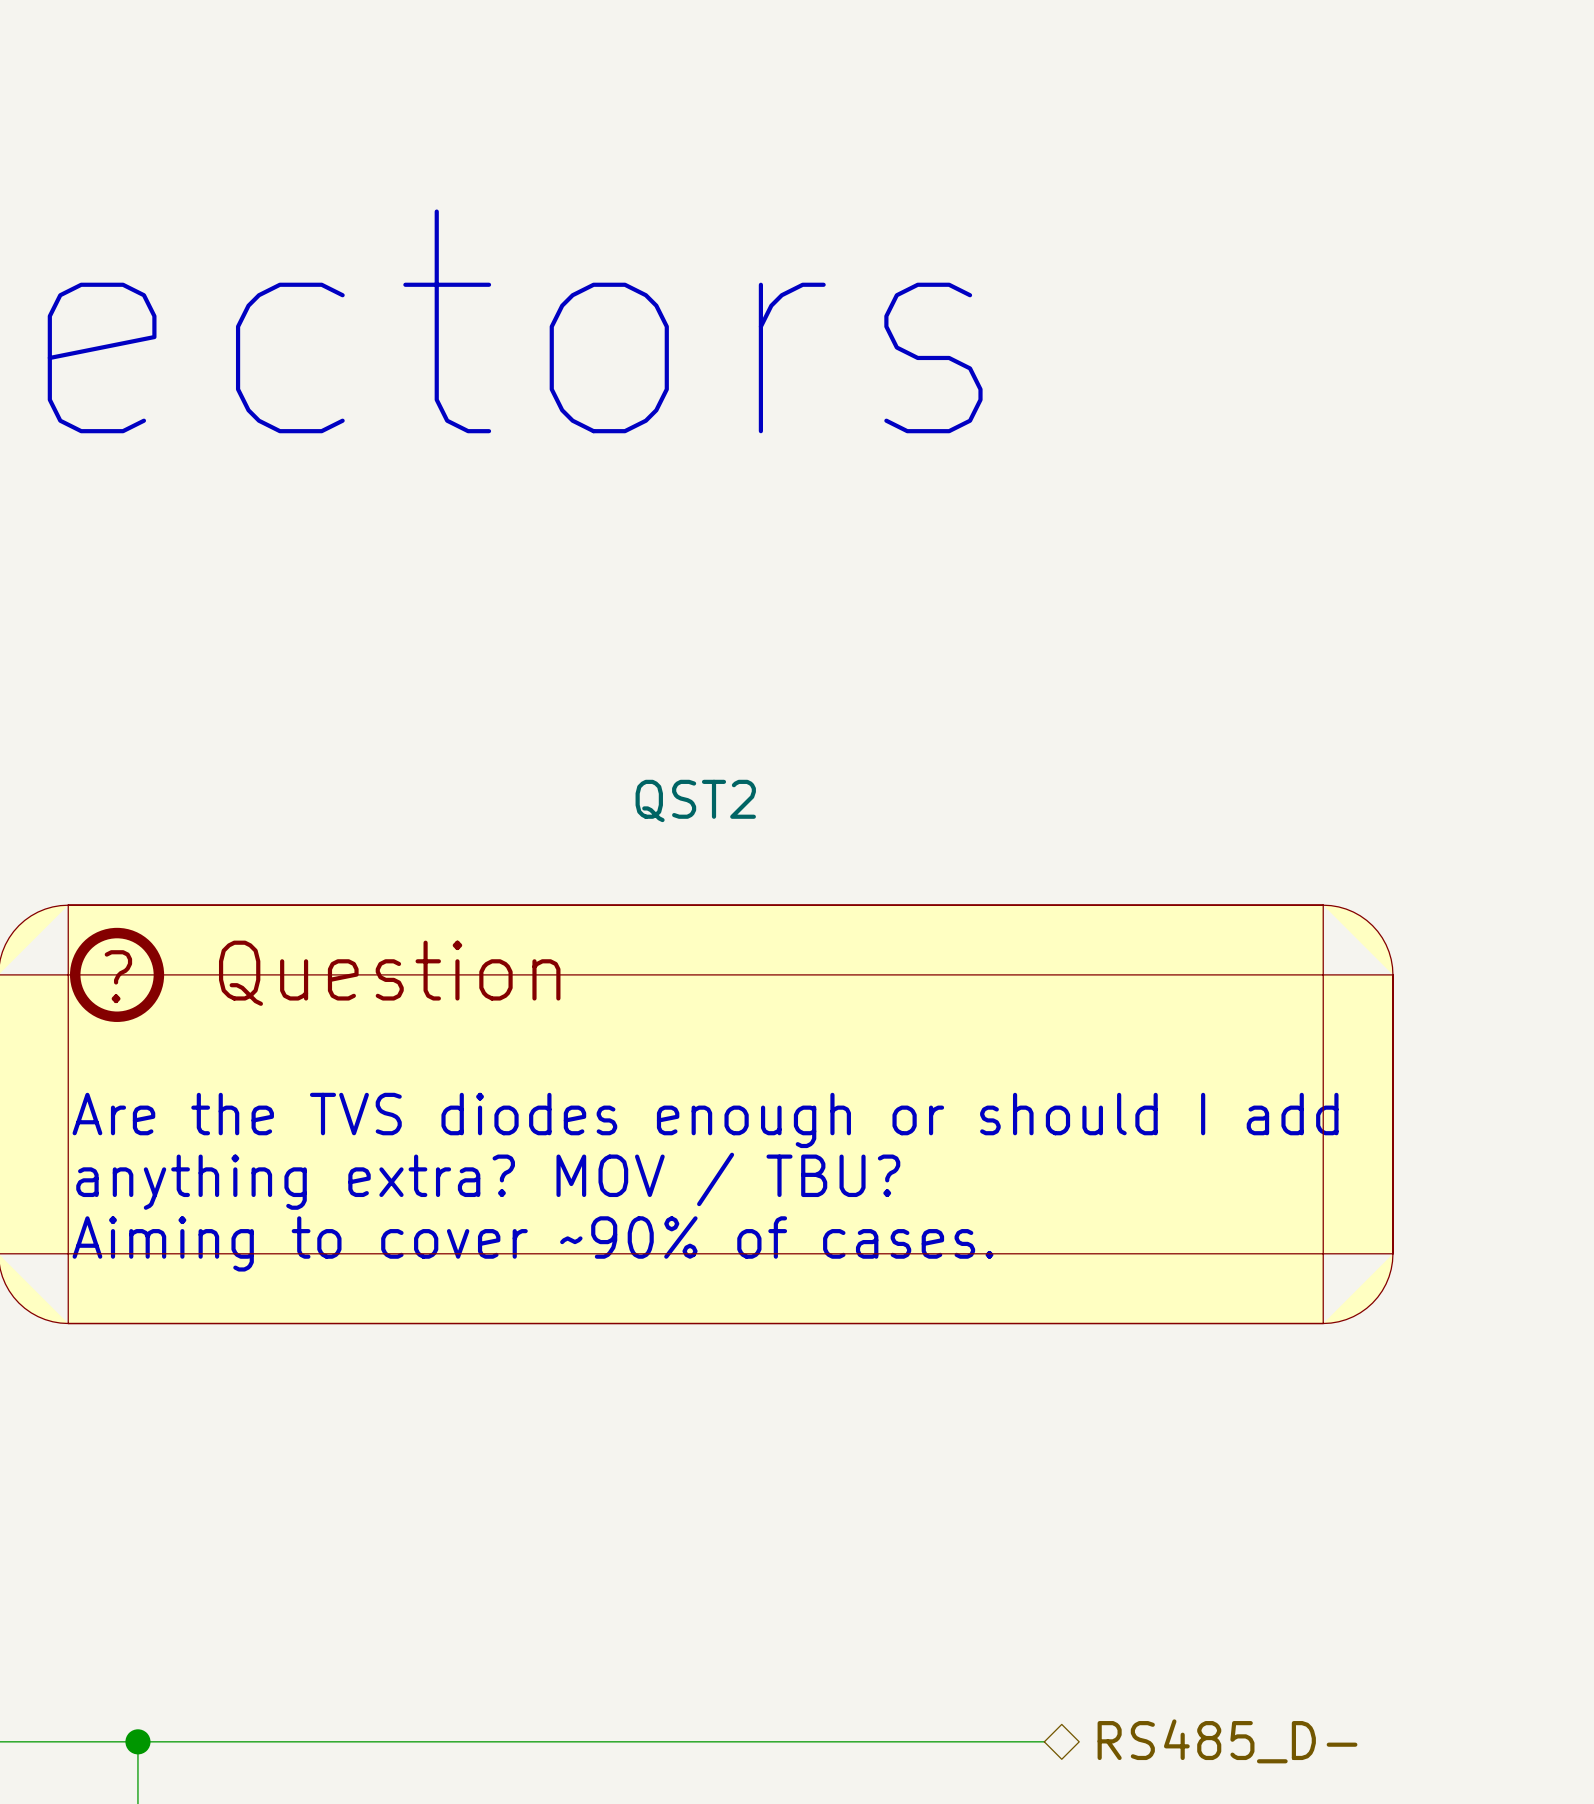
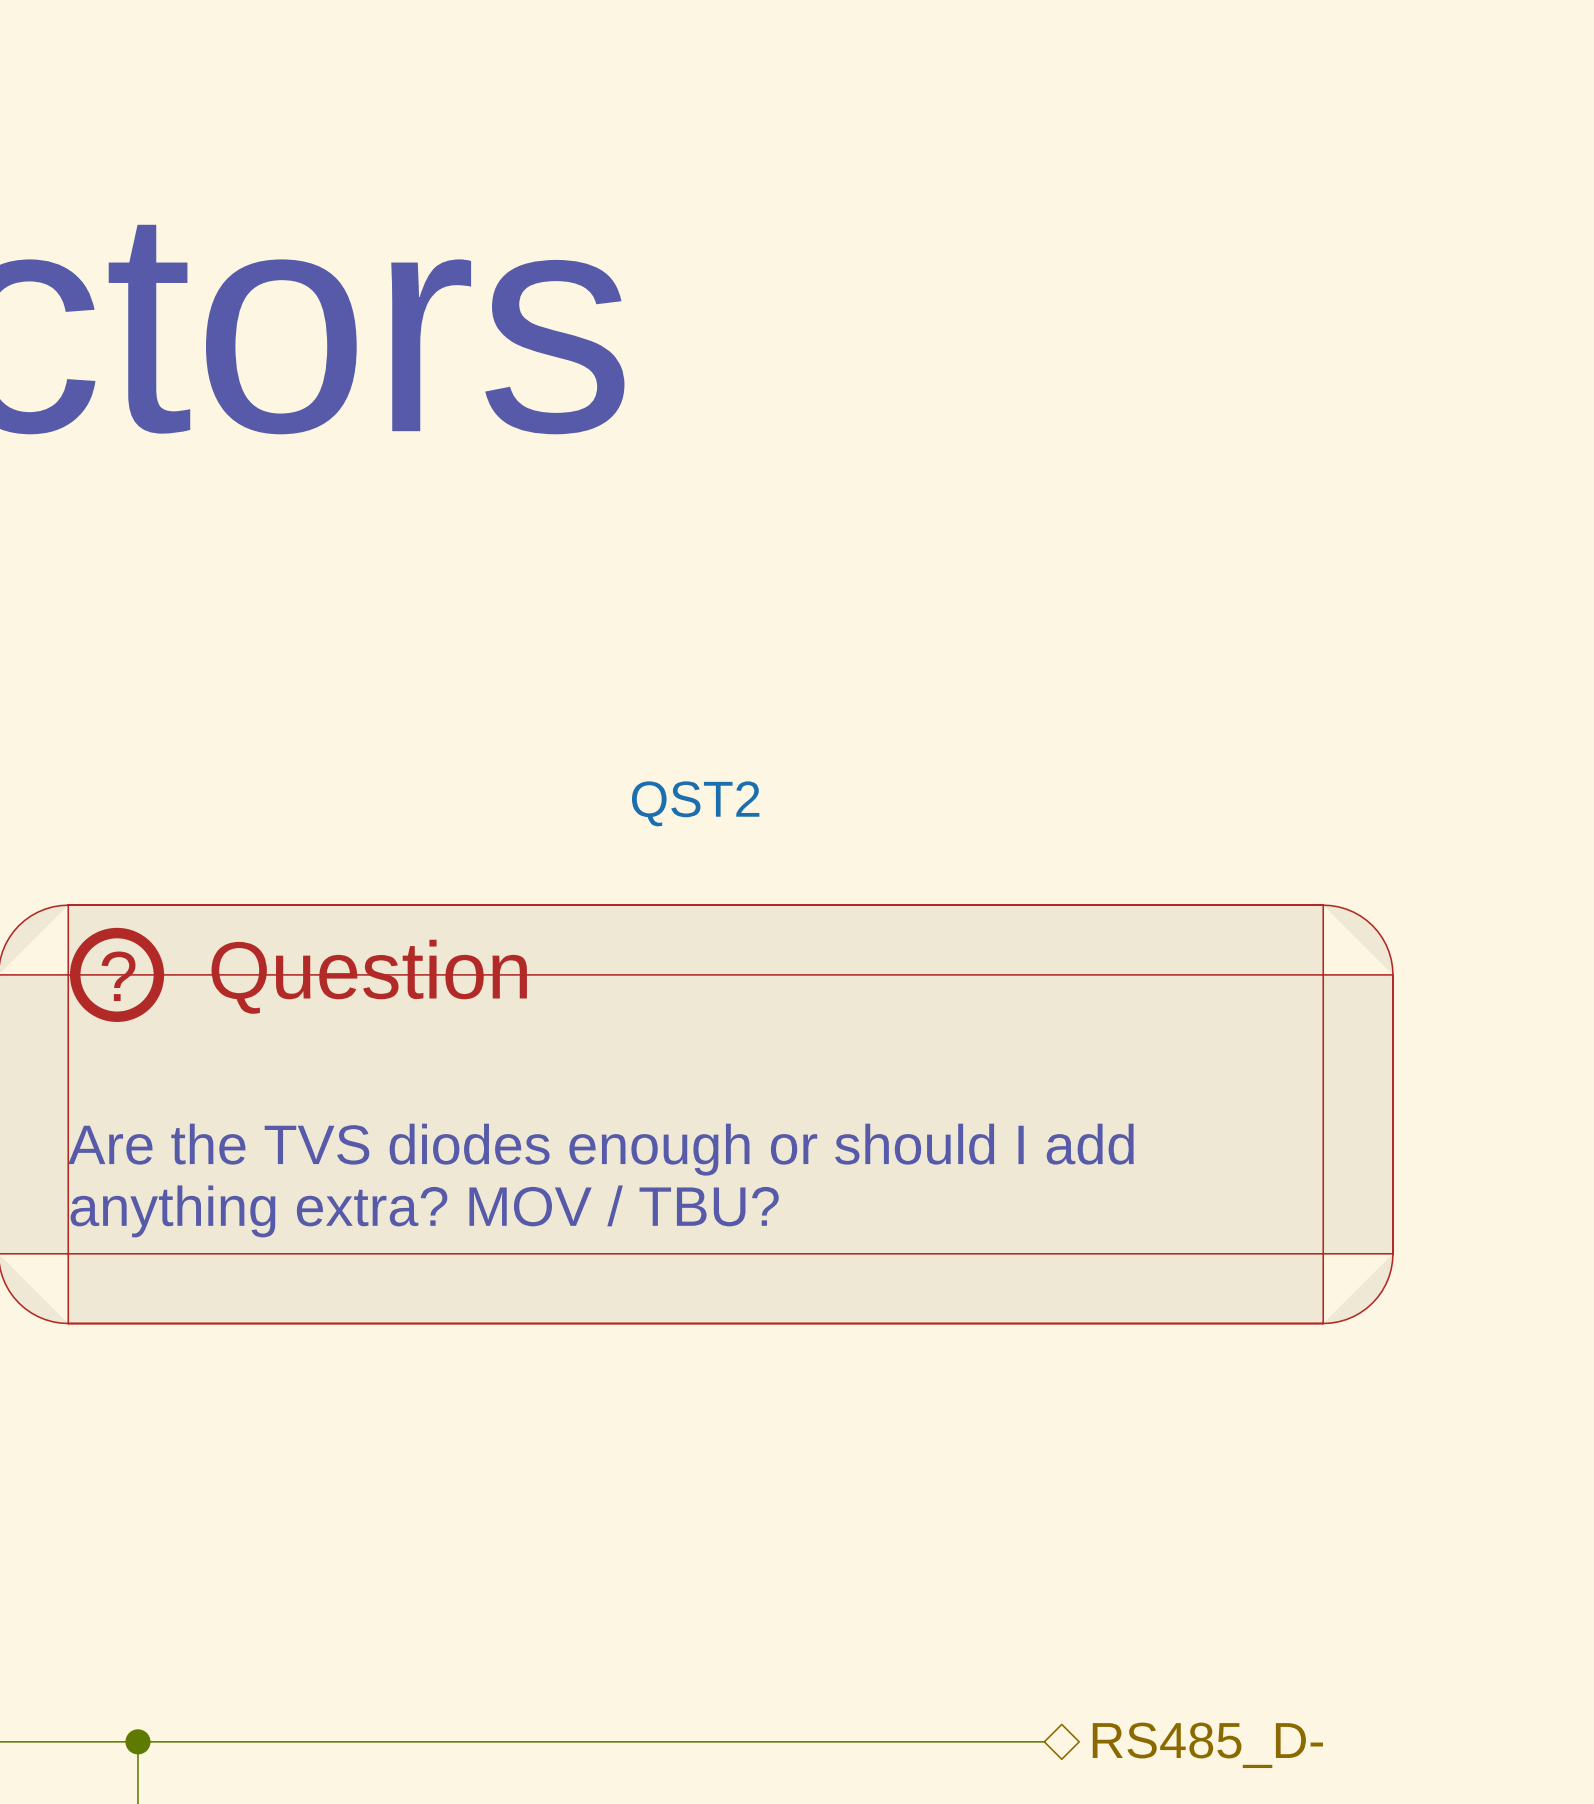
text position: Are the TVS diodes enough or should I add (705, 1120) -> Are the TVS diodes enough or should I add (601, 1149)
text position: anything extra? MOV / TBU? (488, 1181) -> anything extra? MOV / TBU? (424, 1211)
text: Aiming to cover ~90% of cases. (532, 1243) -> none

